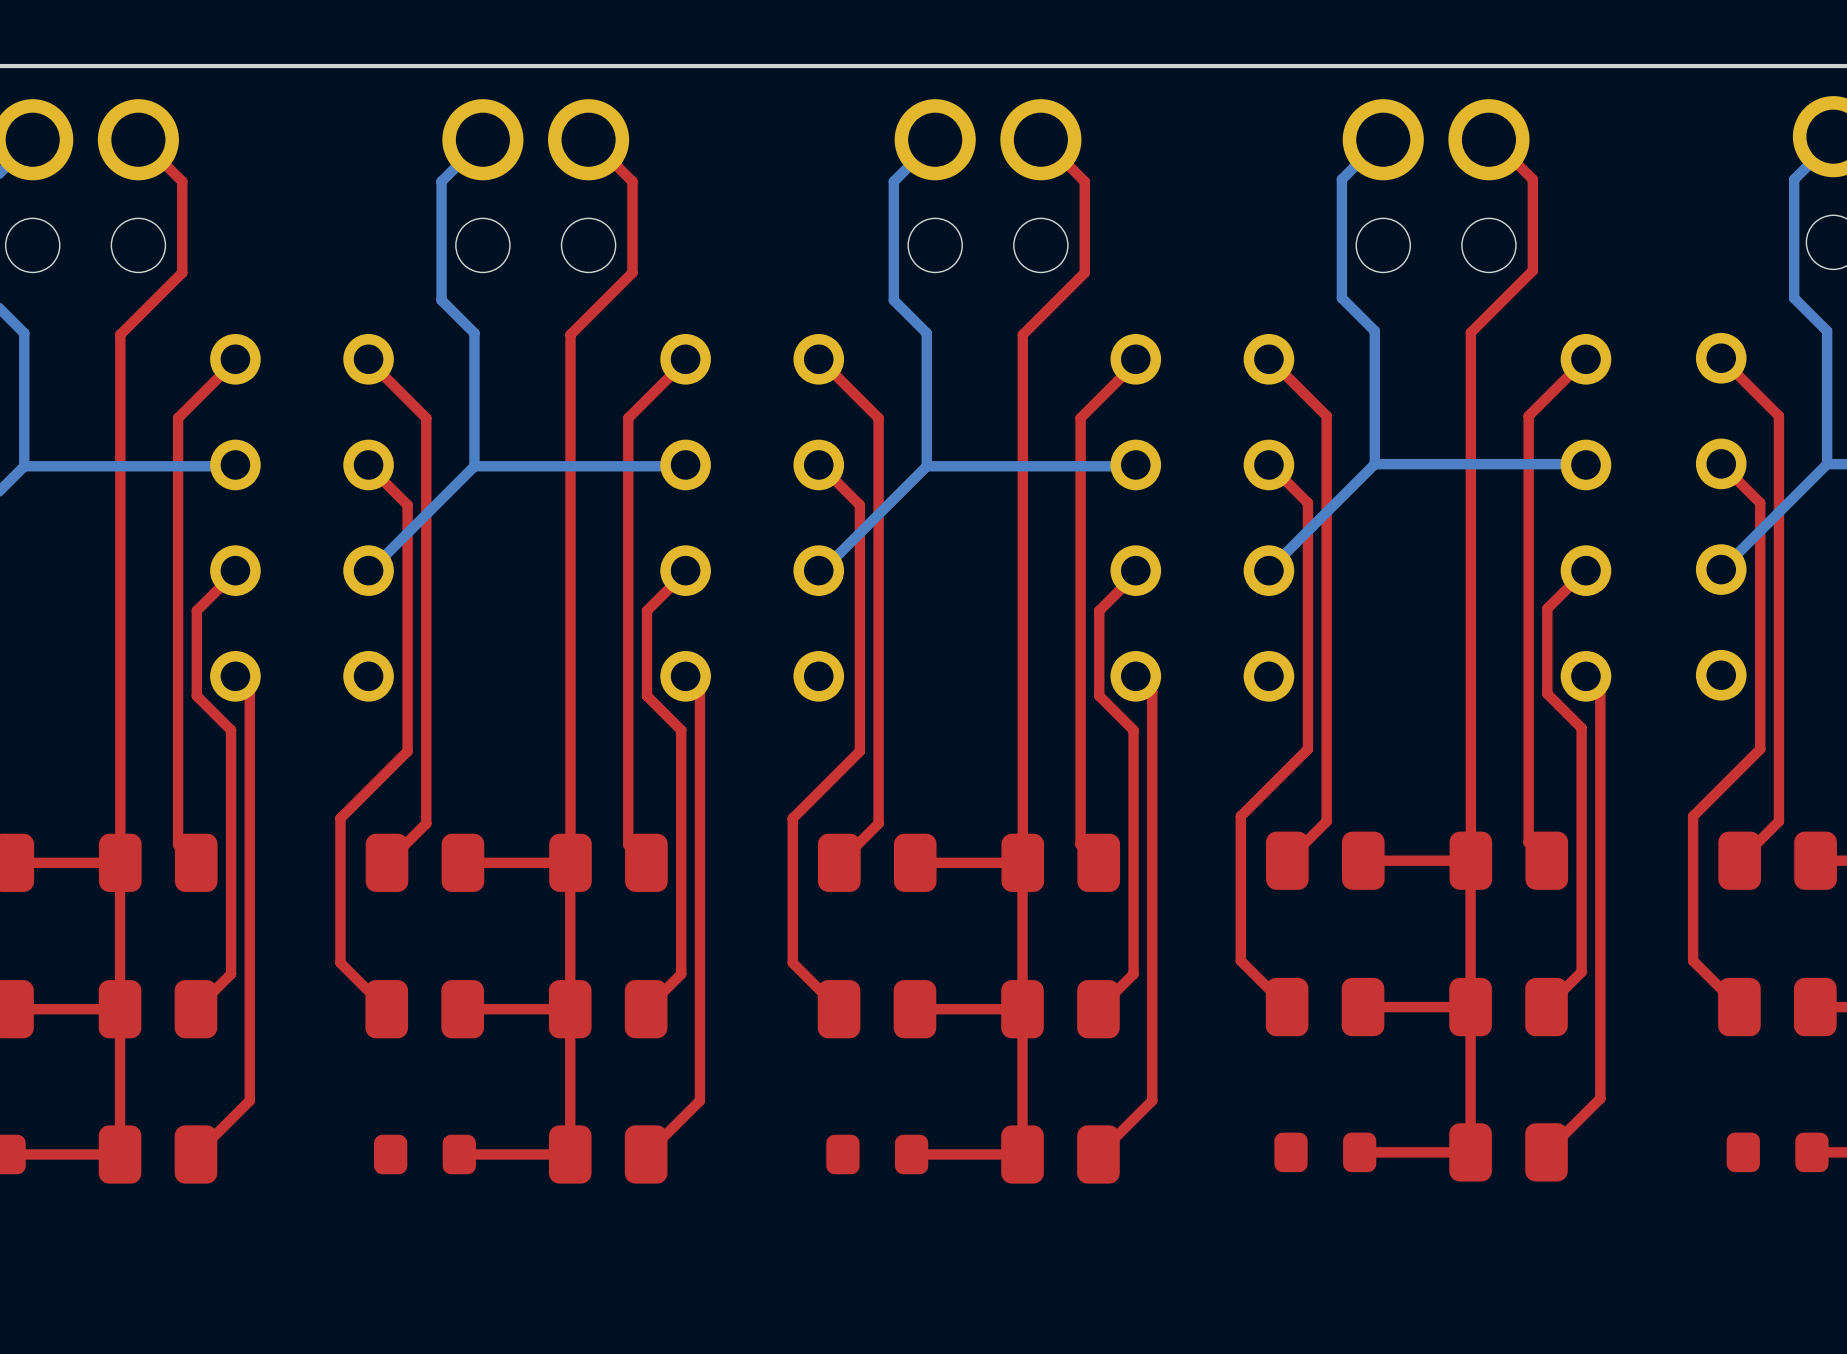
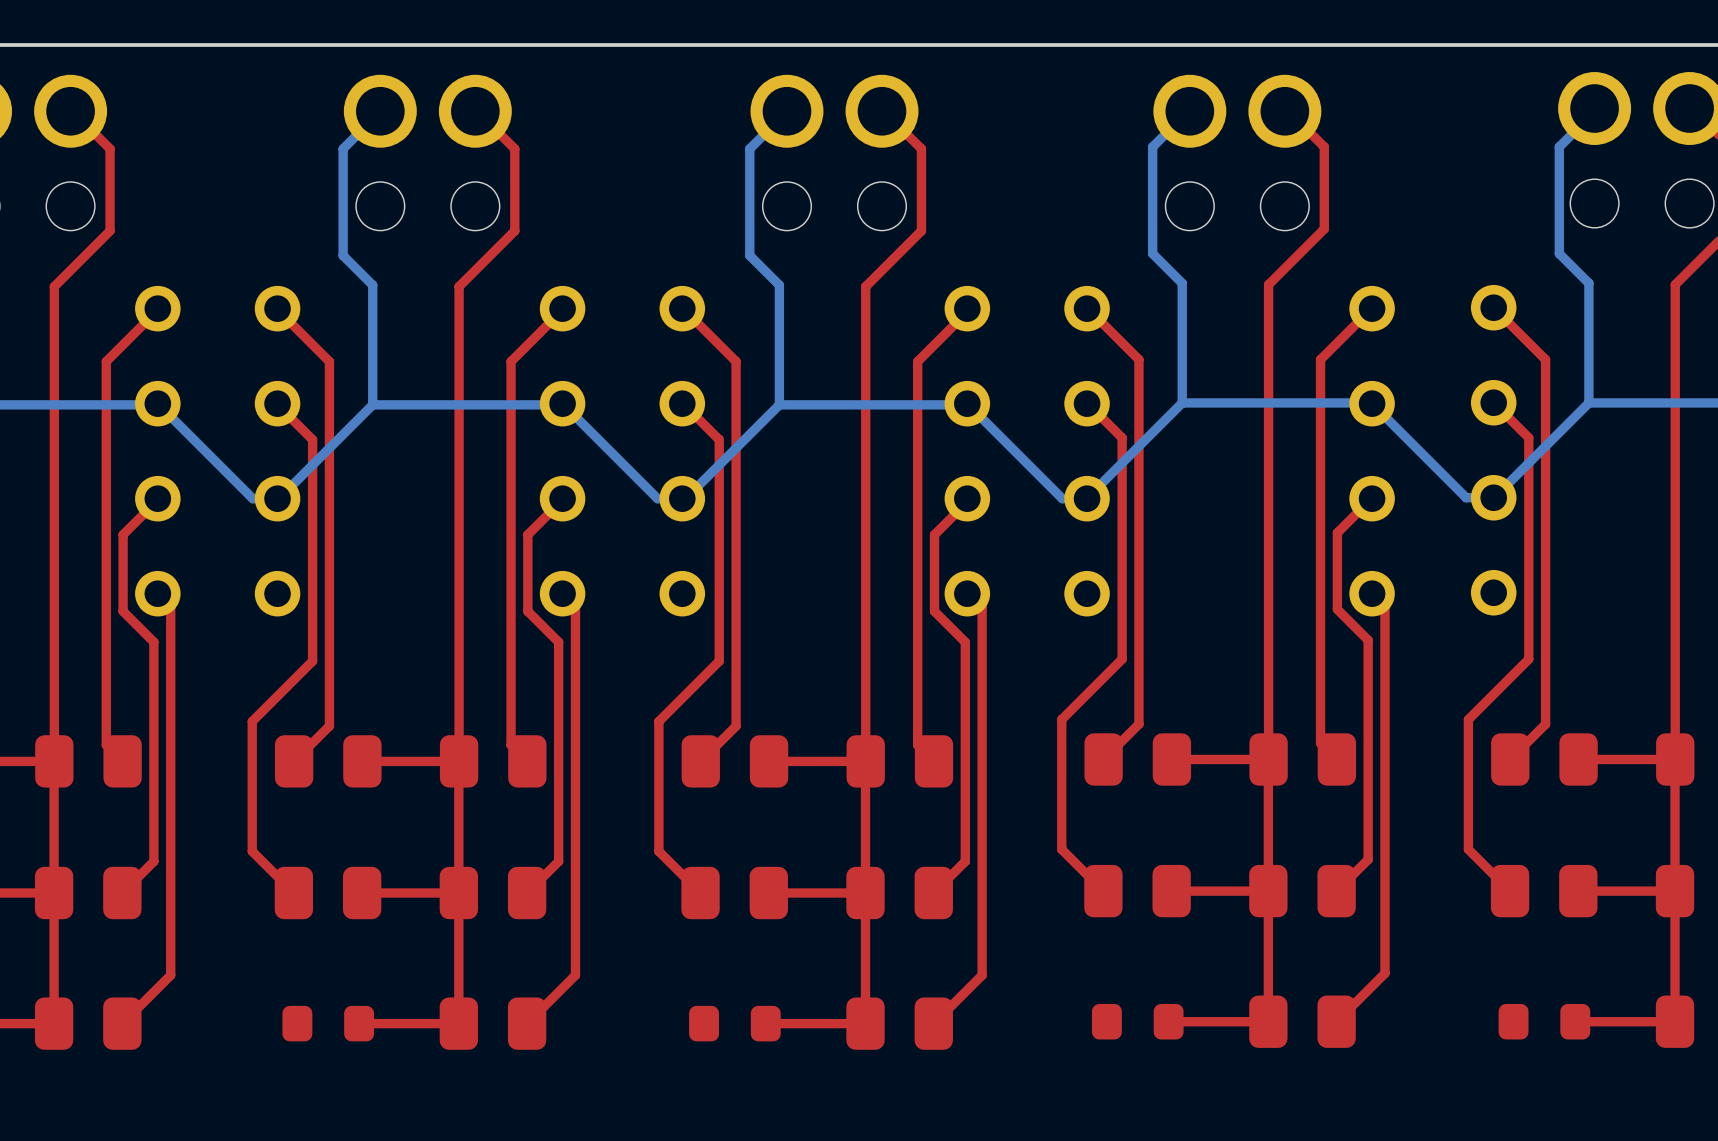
bottom track: none -> (157, 403) (252, 498) (277, 498)
bottom track: none -> (562, 403) (657, 498) (682, 498)
bottom track: none -> (967, 403) (1062, 498) (1087, 498)
bottom track: none -> (1372, 403) (1466, 497) (1493, 497)

